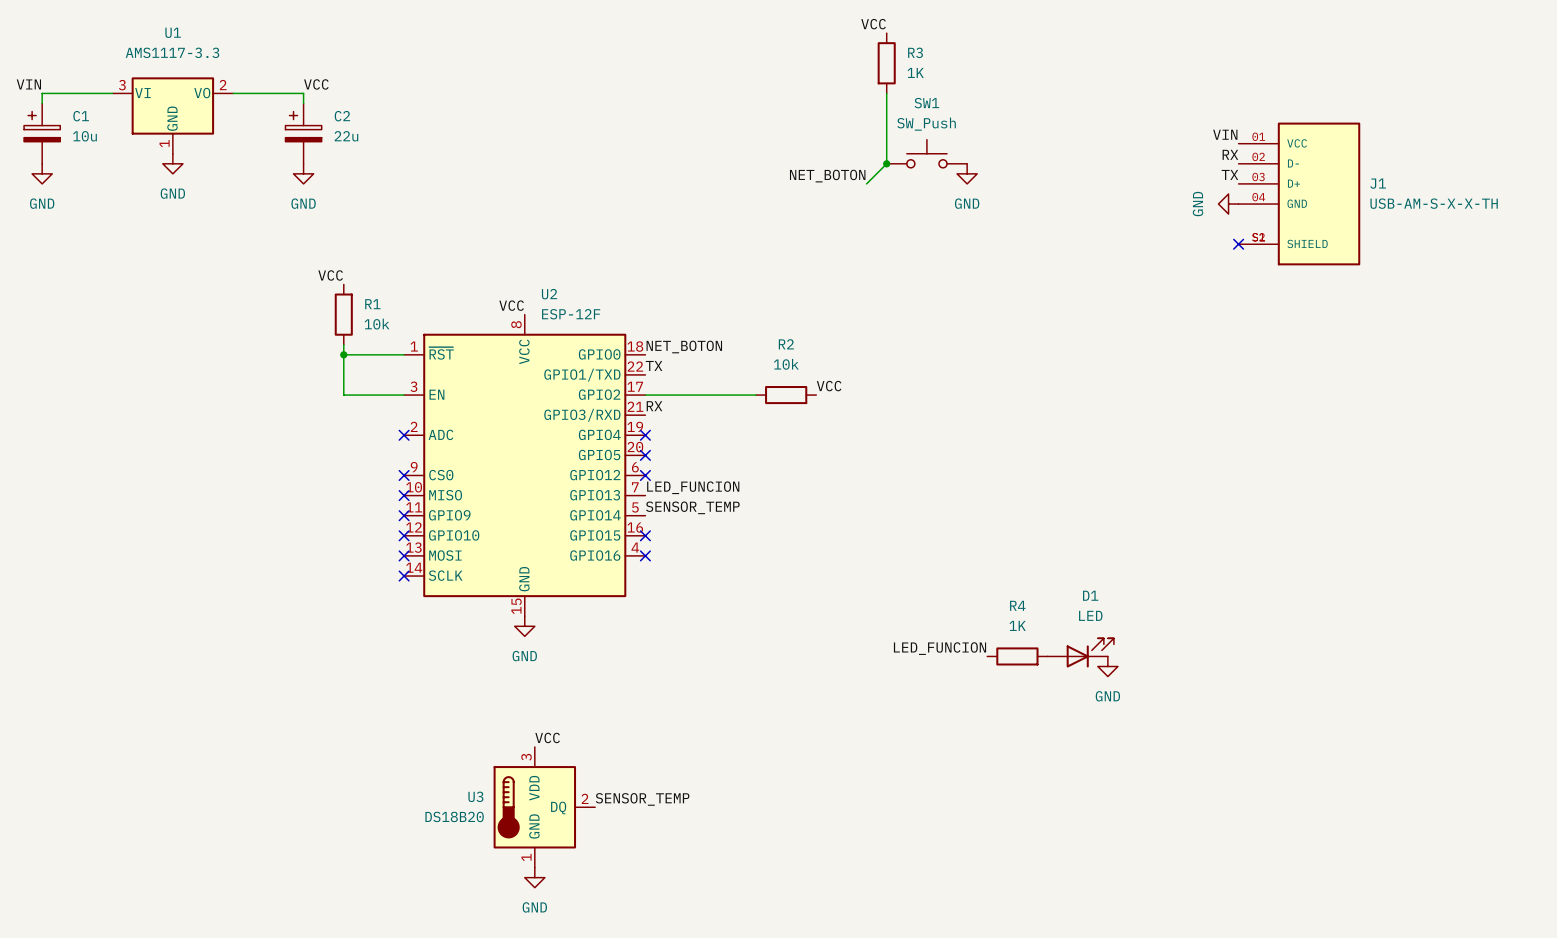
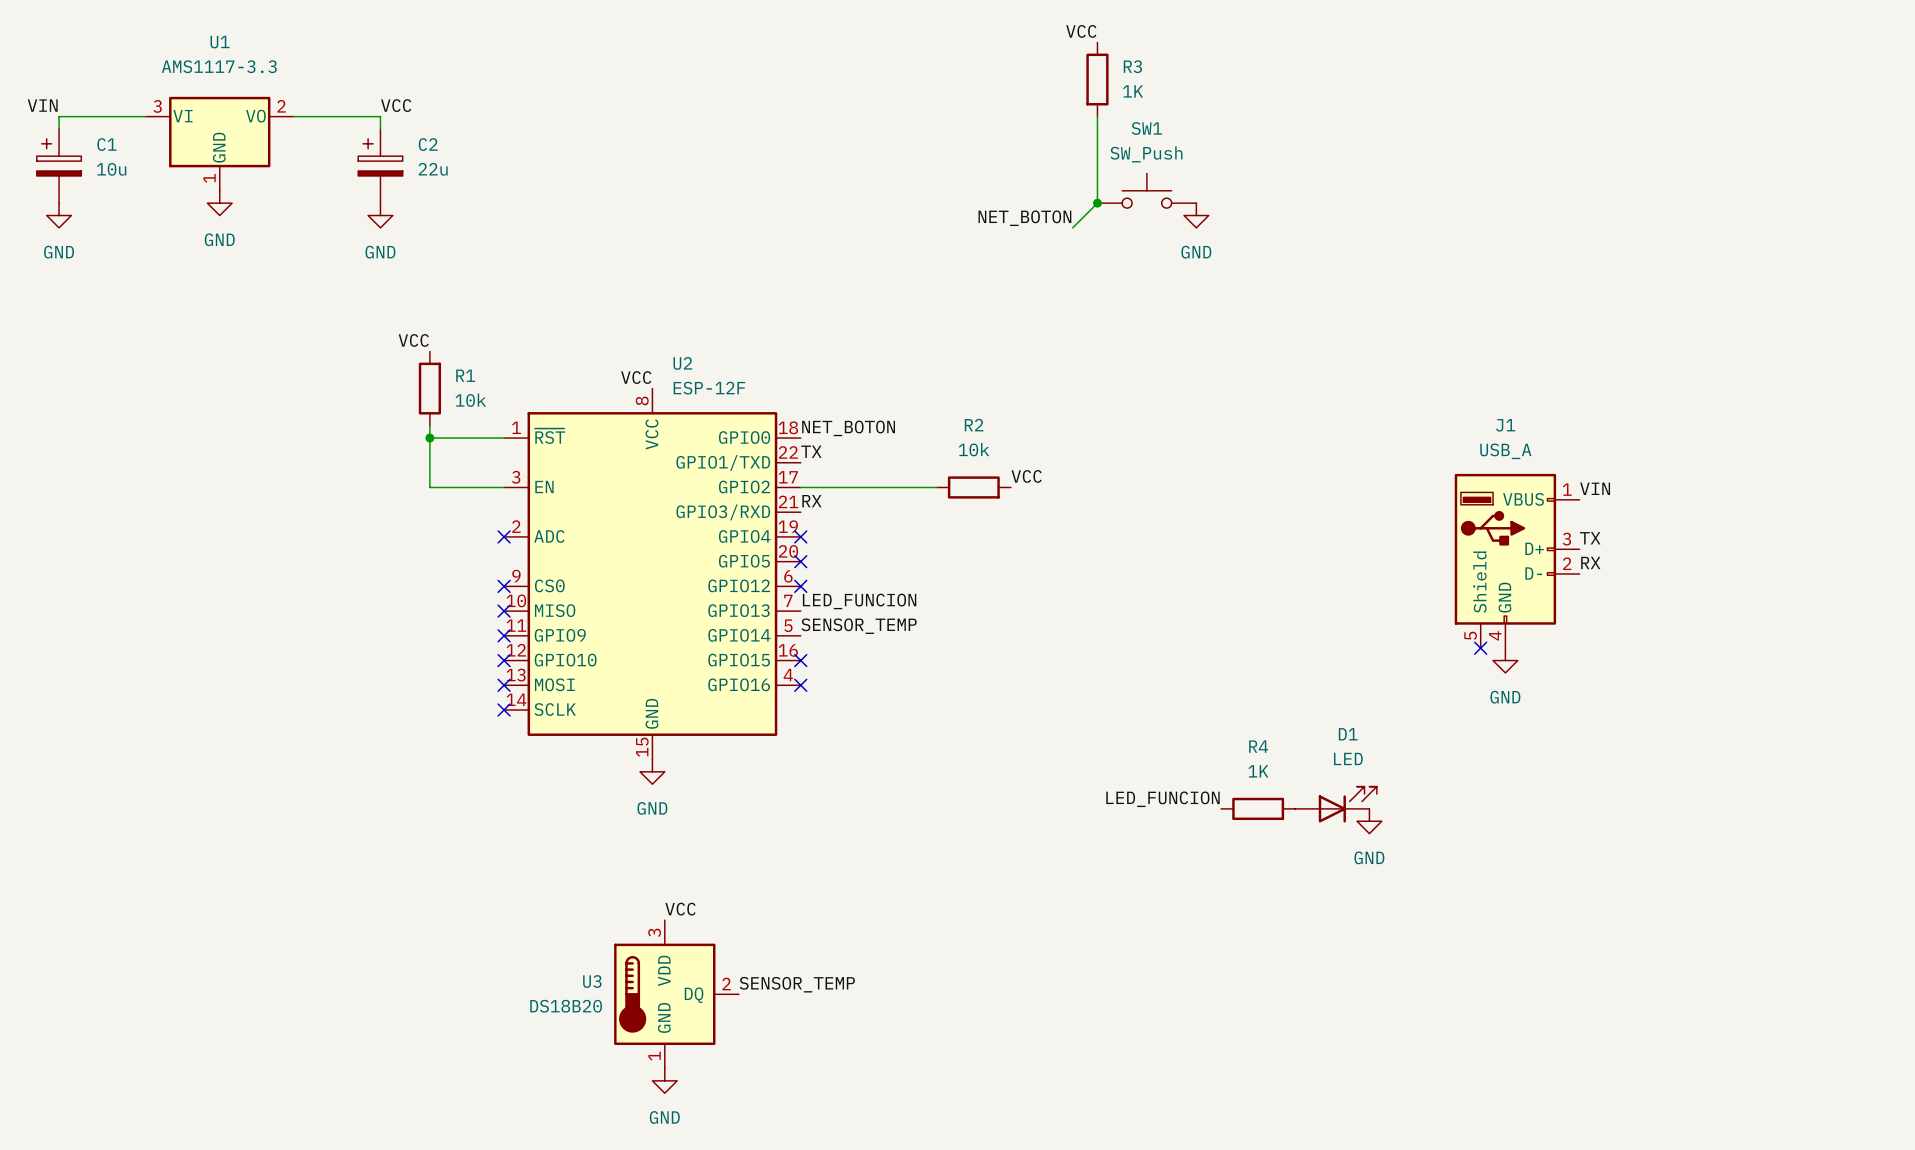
J1 symbol: [1238, 122, 1361, 266] -> [1454, 473, 1580, 649]
label: VIN (1225, 134) -> none
label: RX (1230, 154) -> none
label: TX (1229, 174) -> none
J1 name position: J1 (1378, 183) -> J1 (1505, 425)
J1 value: USB-AM-S-X-X-TH (1434, 203) -> USB_A (1505, 451)
power symbol: GND (1228, 204) -> none
no-connect mark: (1238, 244) -> none
label: none -> VIN (1595, 488)
label: none -> TX (1590, 538)
label: none -> RX (1590, 562)
no-connect mark: none -> (1480, 648)
power symbol: none -> GND (1505, 660)

